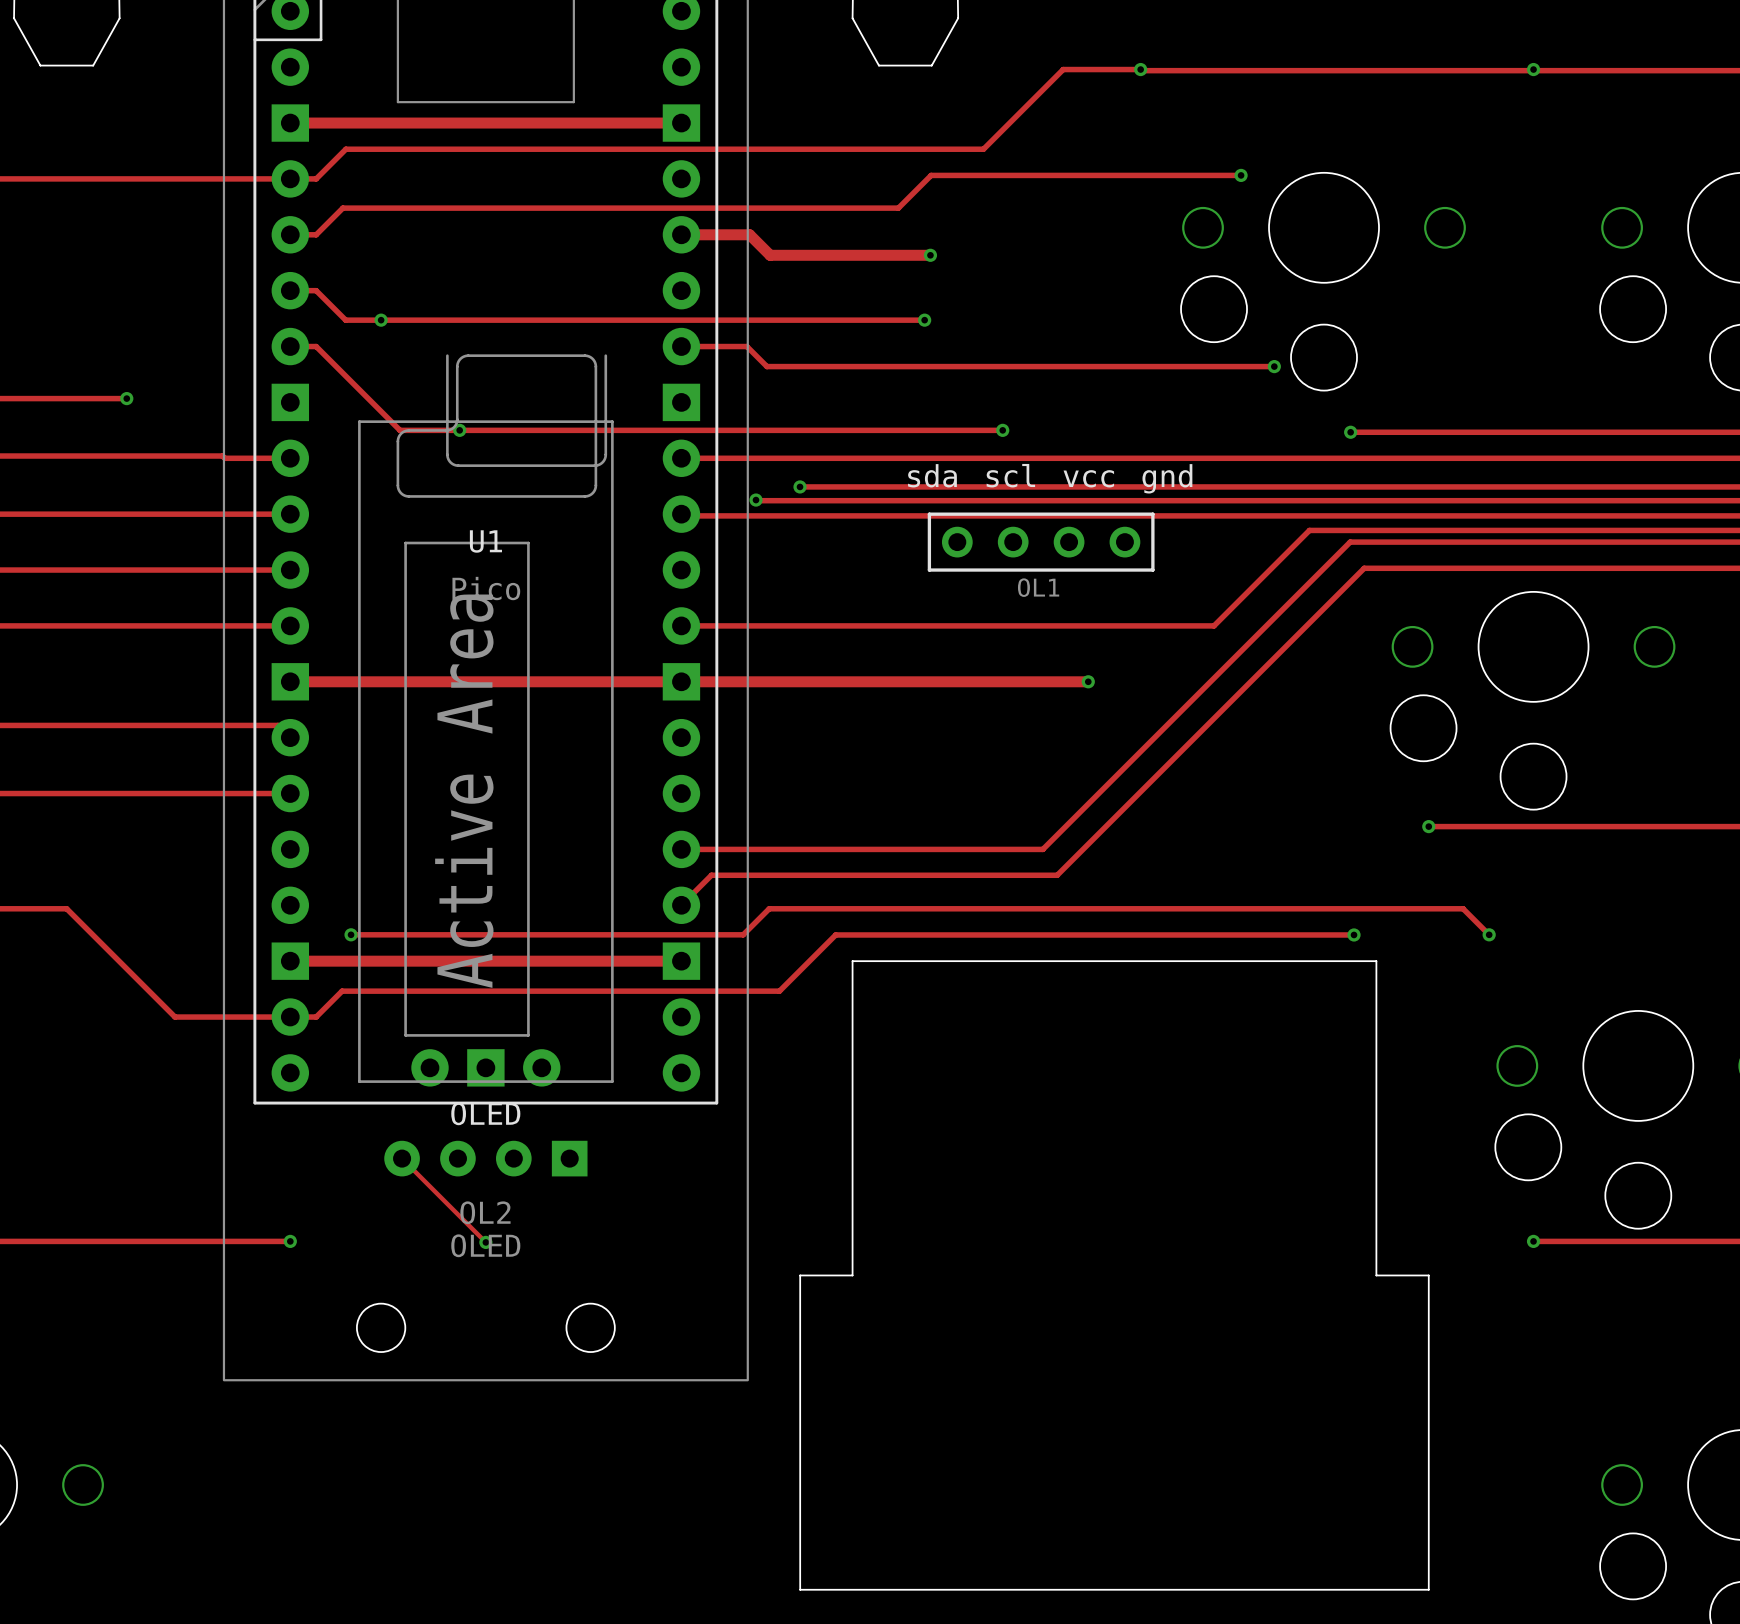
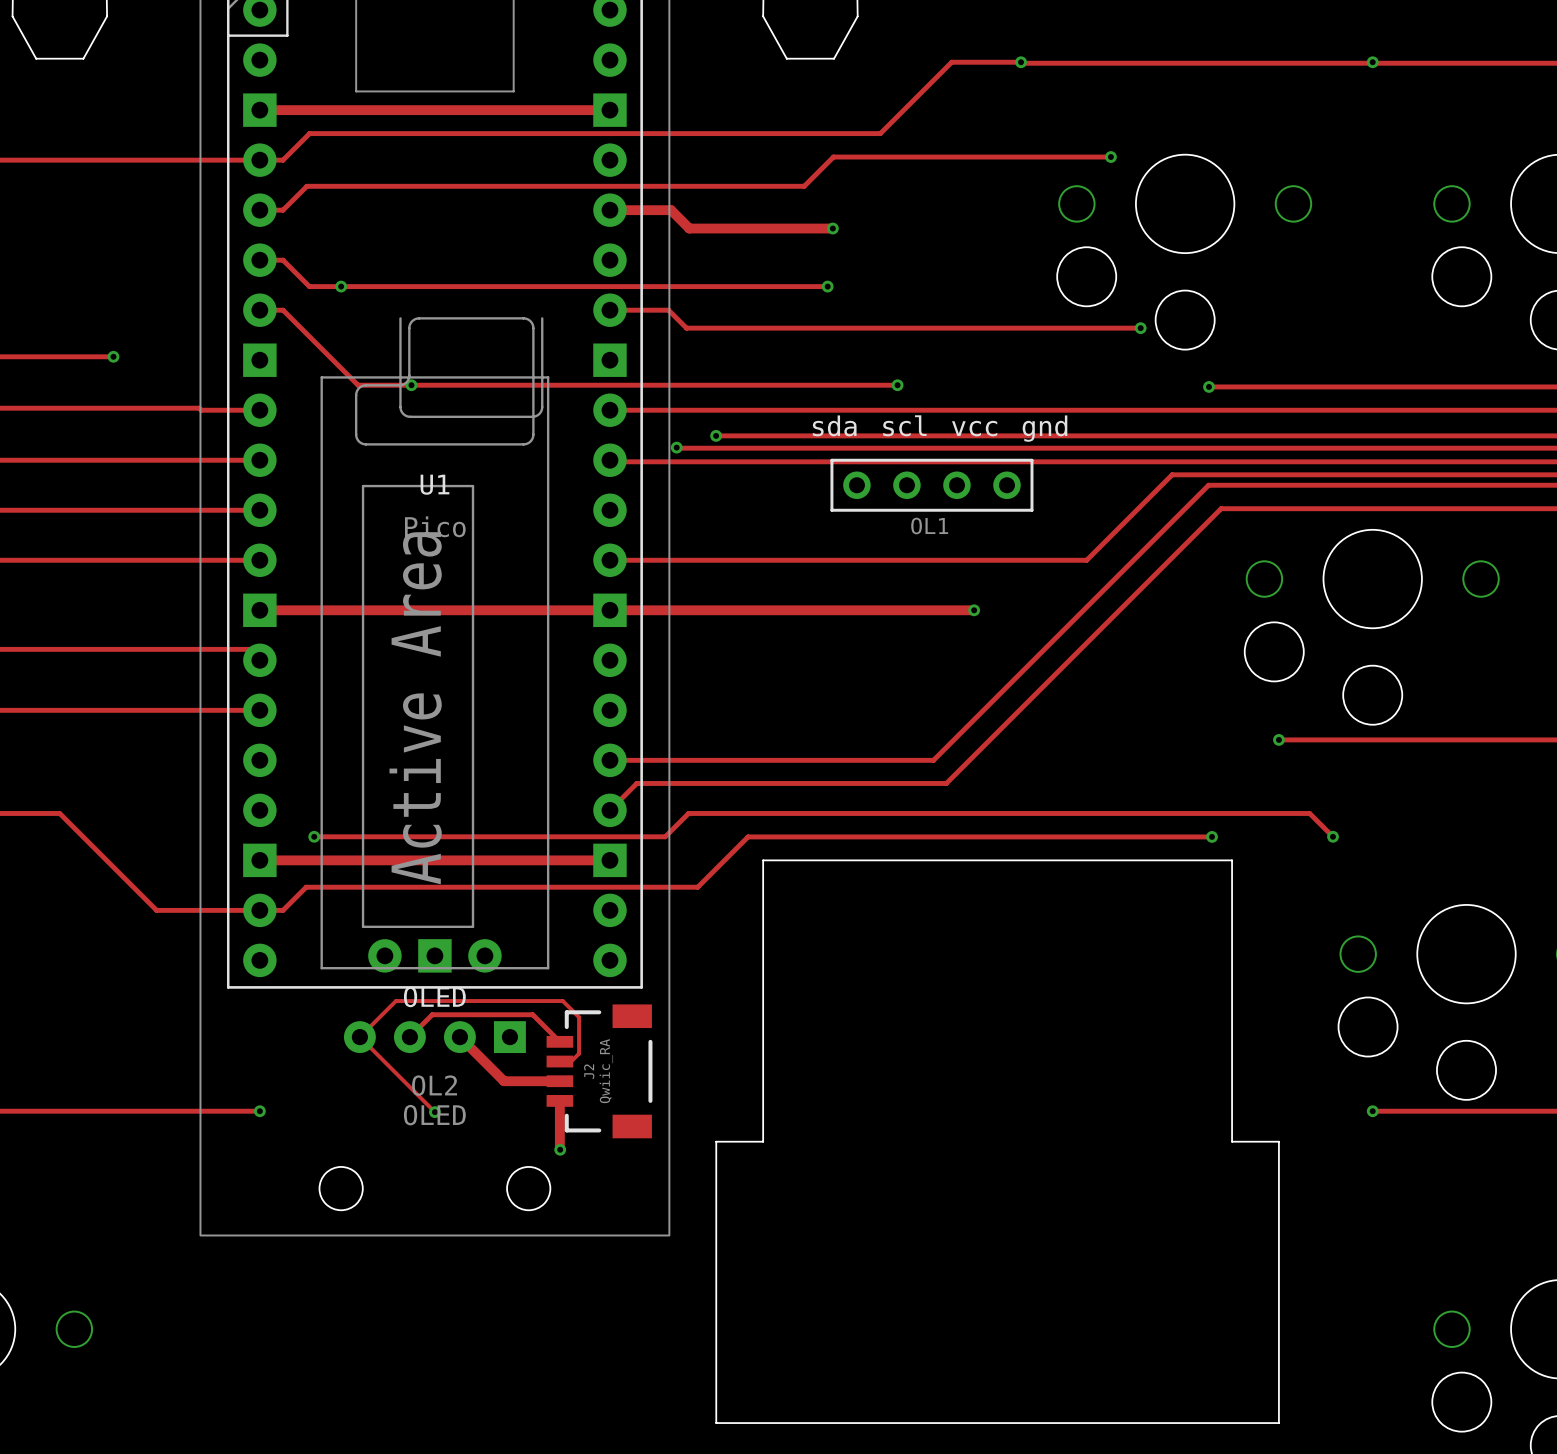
track: none -> (359, 1037) (395, 1001) (562, 1001) (579, 1017) (579, 1053) (571, 1061) (559, 1061)
track: none -> (409, 1037) (432, 1014) (532, 1014) (559, 1041)
track: none -> (459, 1037) (504, 1081) (559, 1081)
J2: none -> Qwiic_RA (599, 1071)
track: none -> (559, 1100) (560, 1149)
via: none -> (560, 1149)

